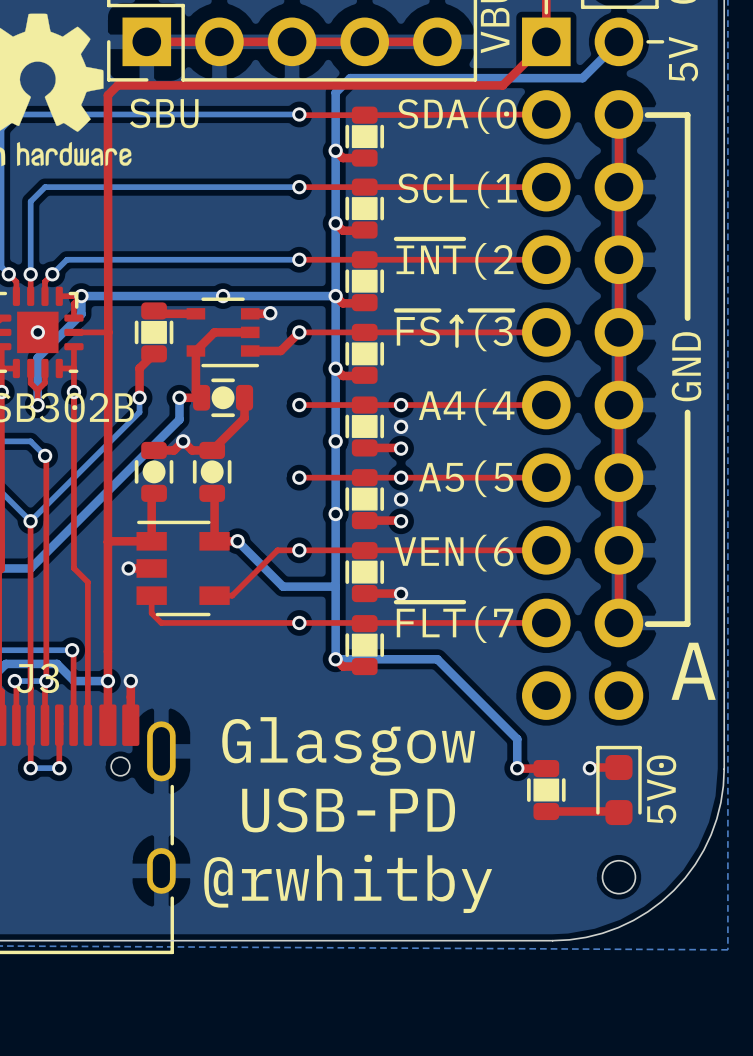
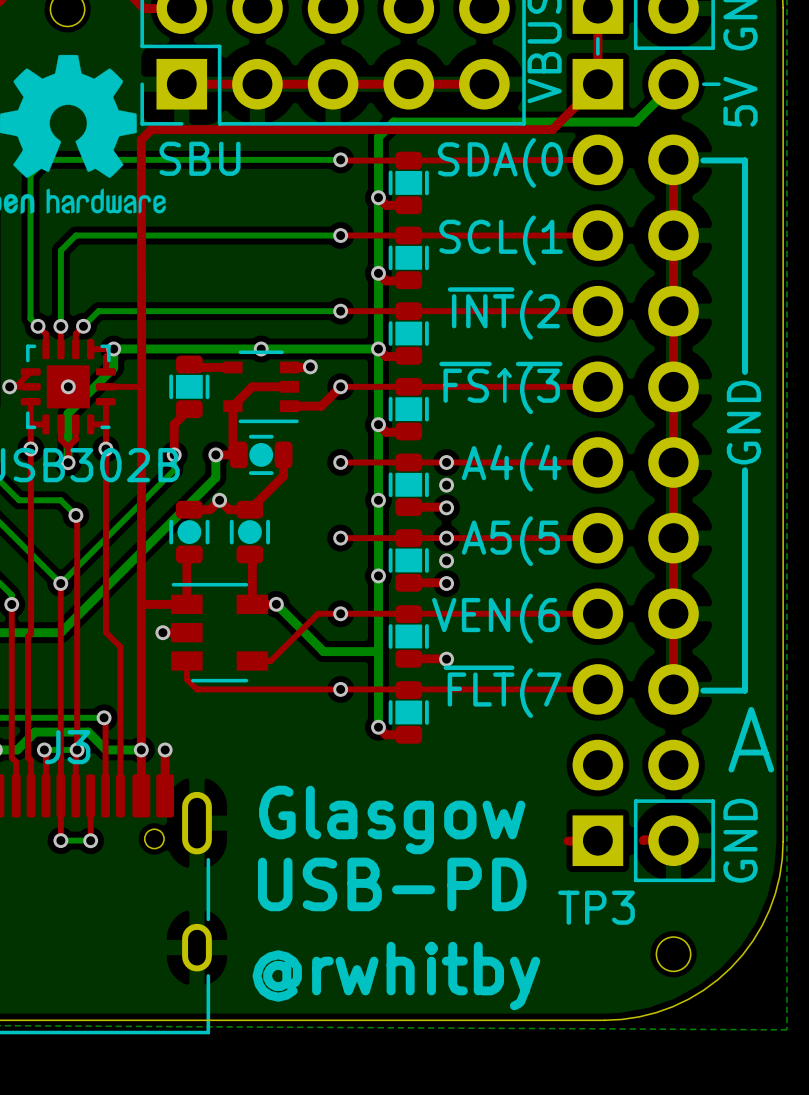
bottom track: (335, 659) (437, 659) (517, 739) (517, 768) -> none
via: (517, 768) -> none
via: (589, 768) -> none
part: none -> (643, 840)
text: none -> GND (740, 840)
part: (618, 785) -> none
text: 5V0 (661, 789) -> none
part: (546, 790) -> none
top track: (546, 811) (618, 812) -> none
text: none -> TP3 (596, 907)
text position: @rwhitby (348, 883) -> @rwhitby (396, 976)

